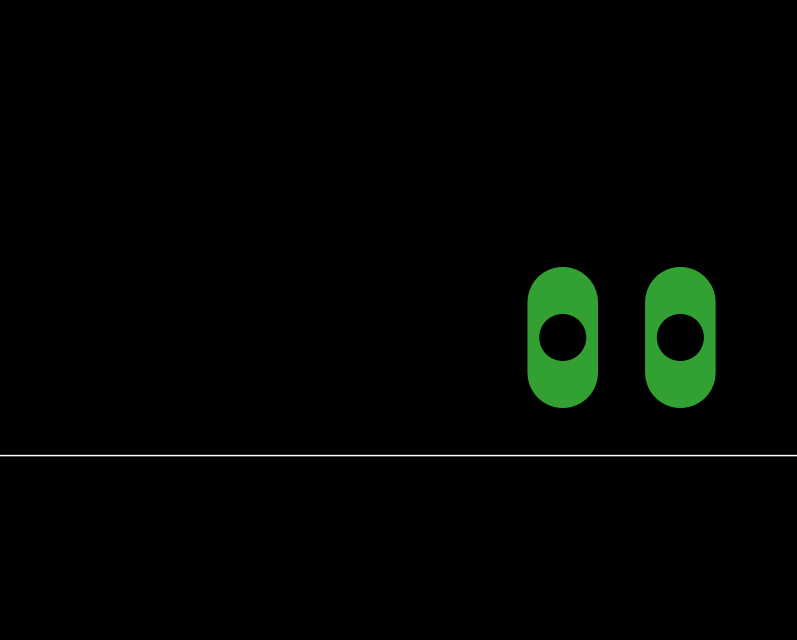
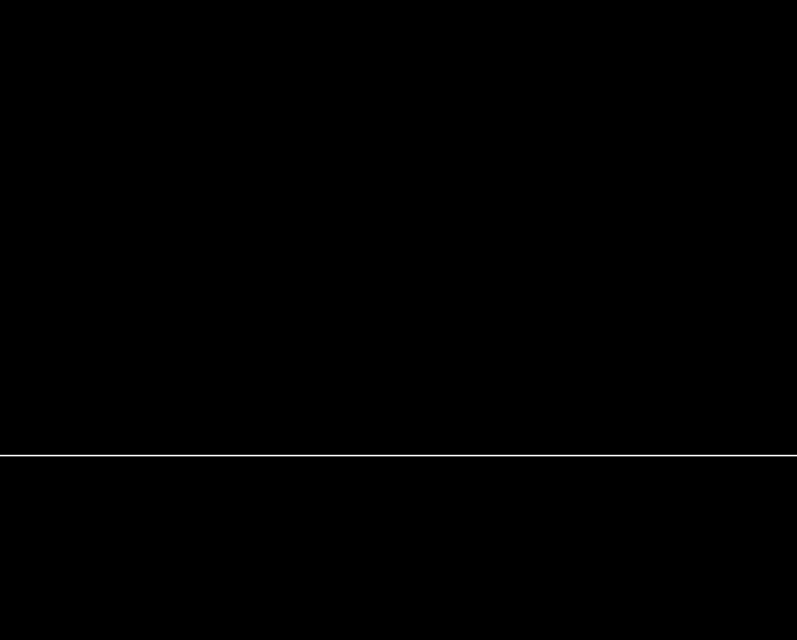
part: (621, 337) -> none

